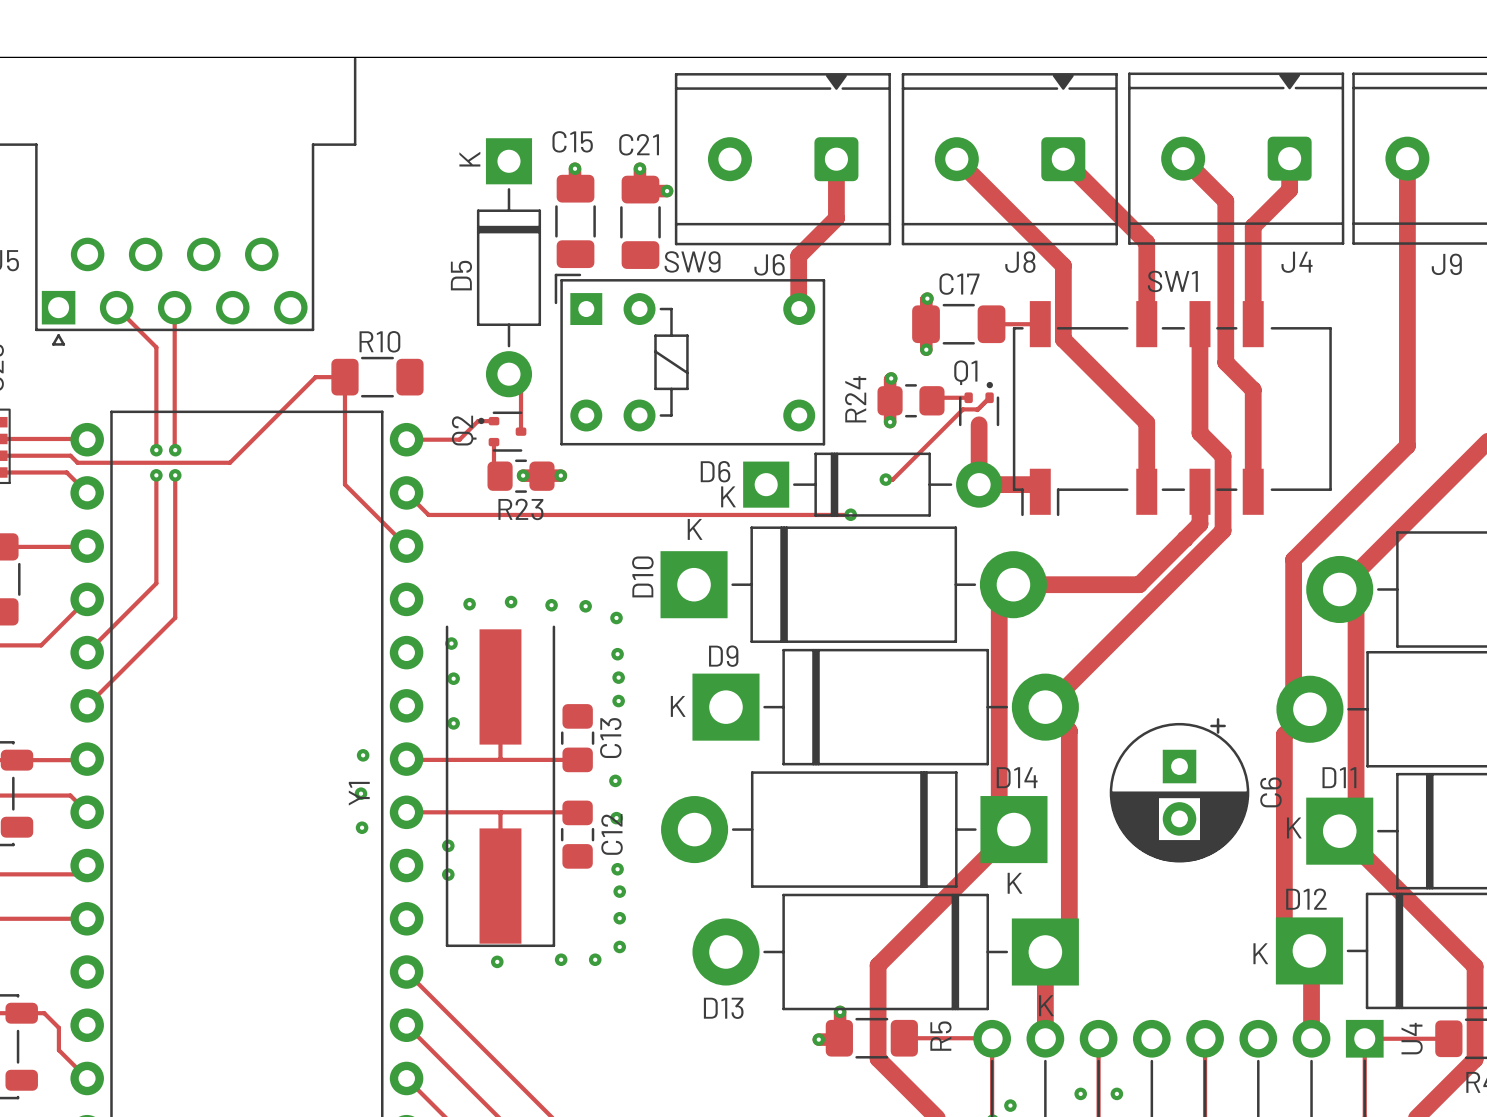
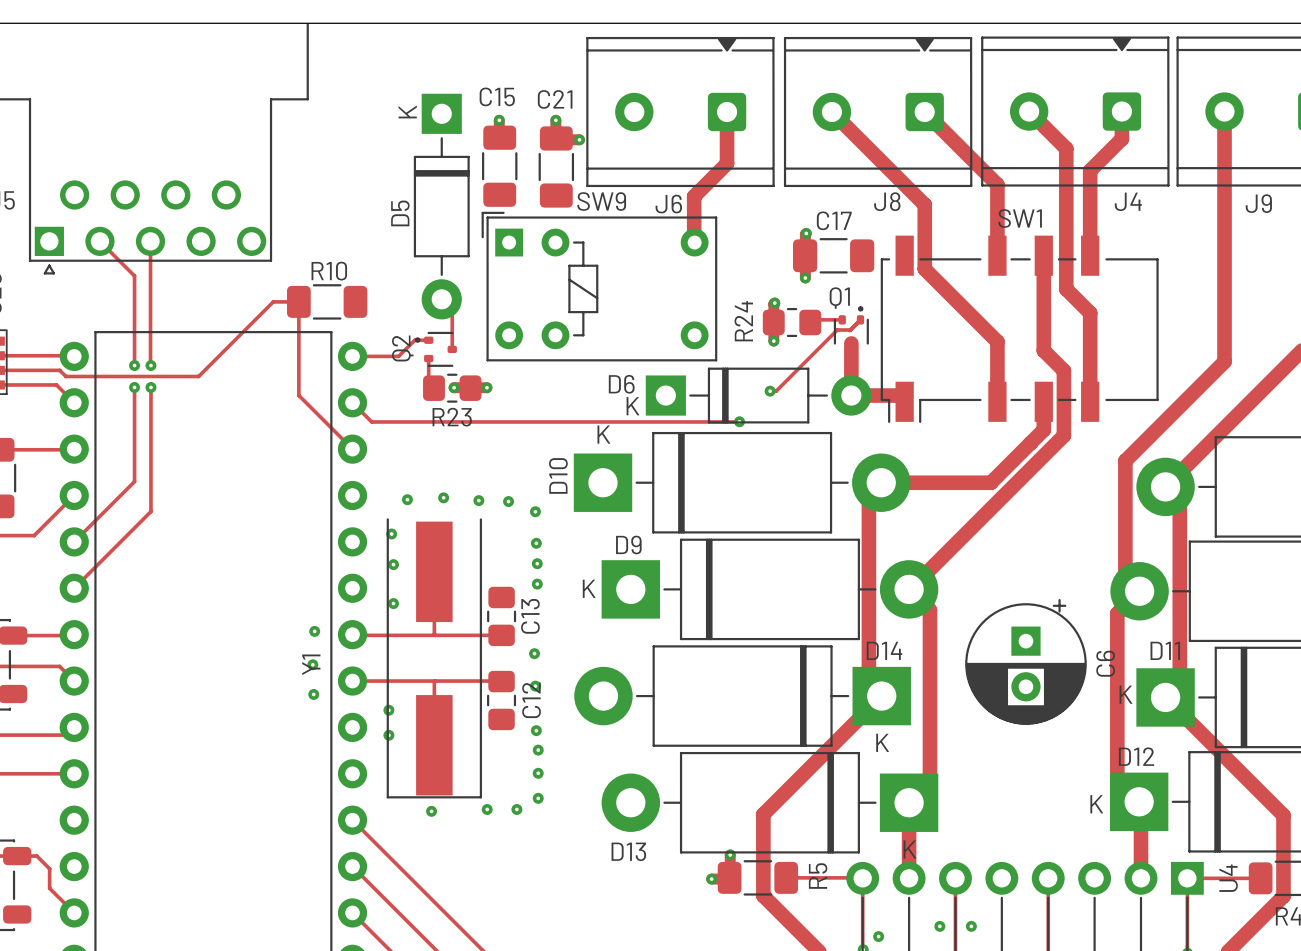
track: (991, 324) (1040, 324) -> none

